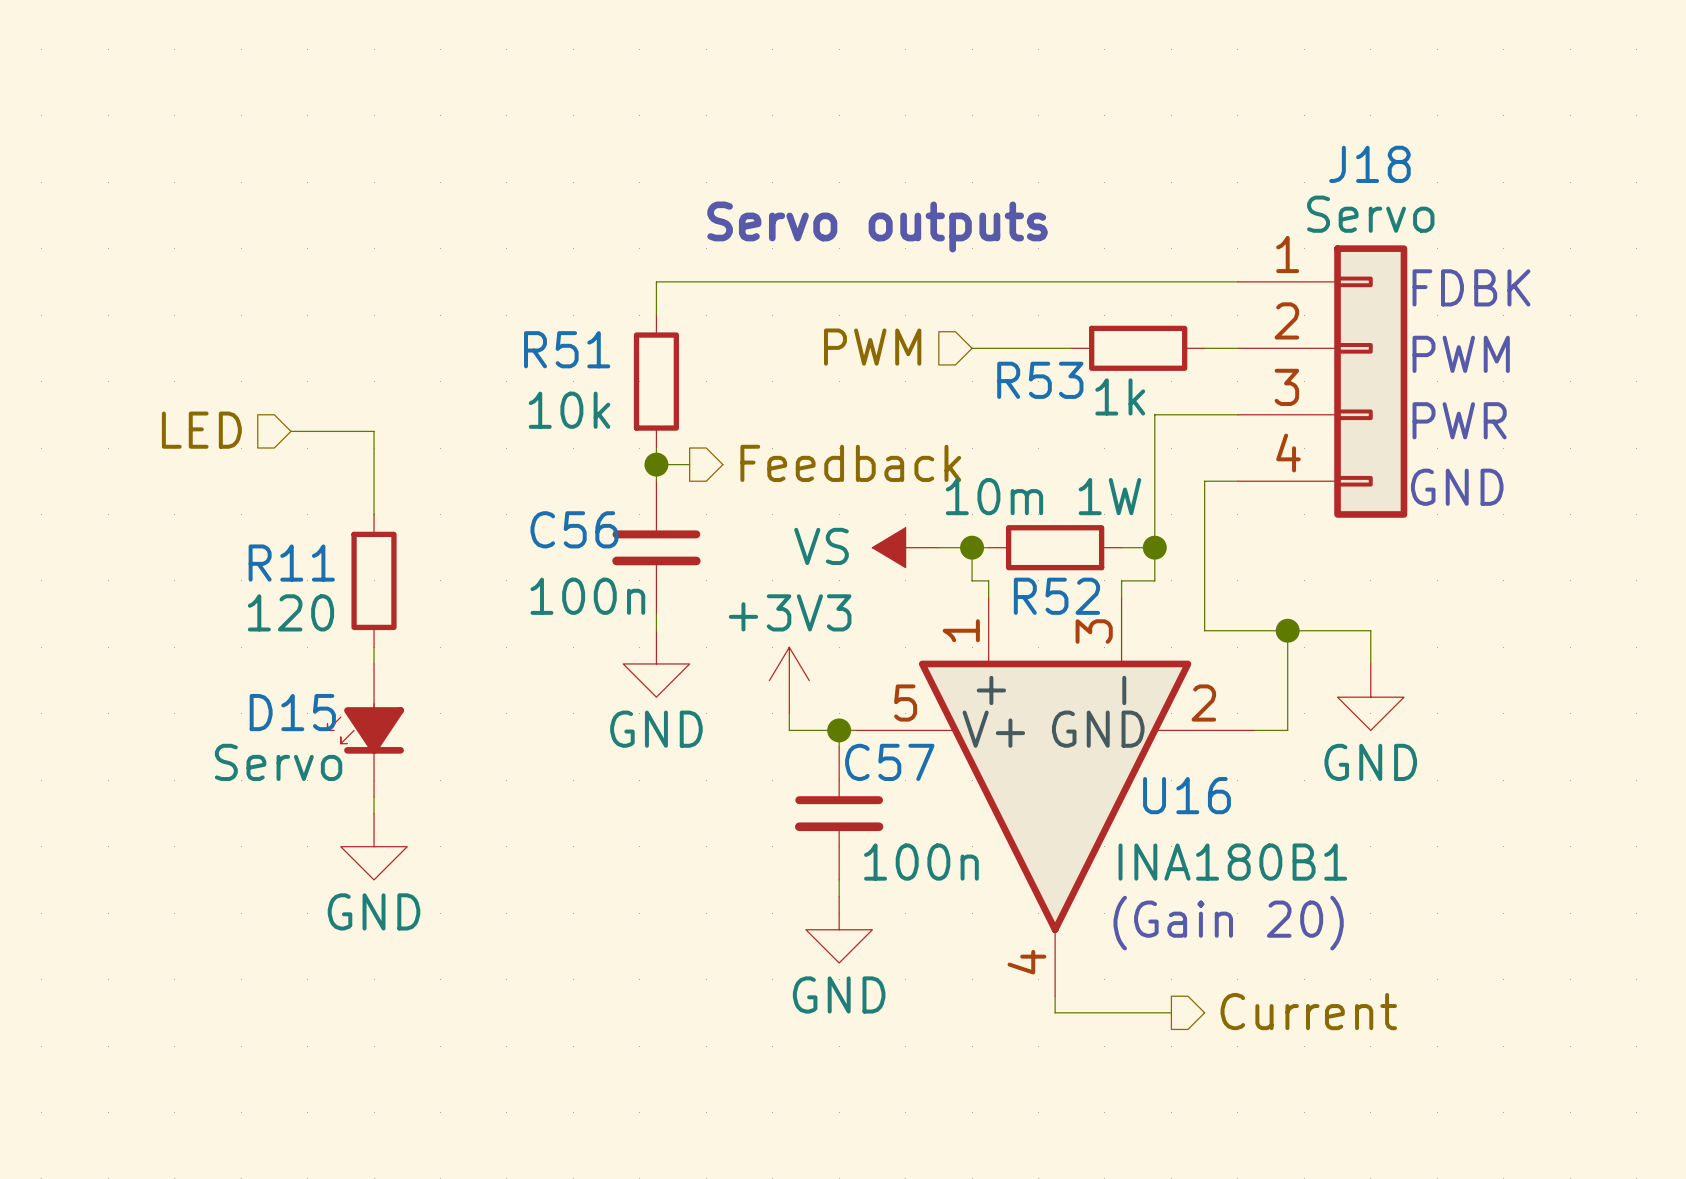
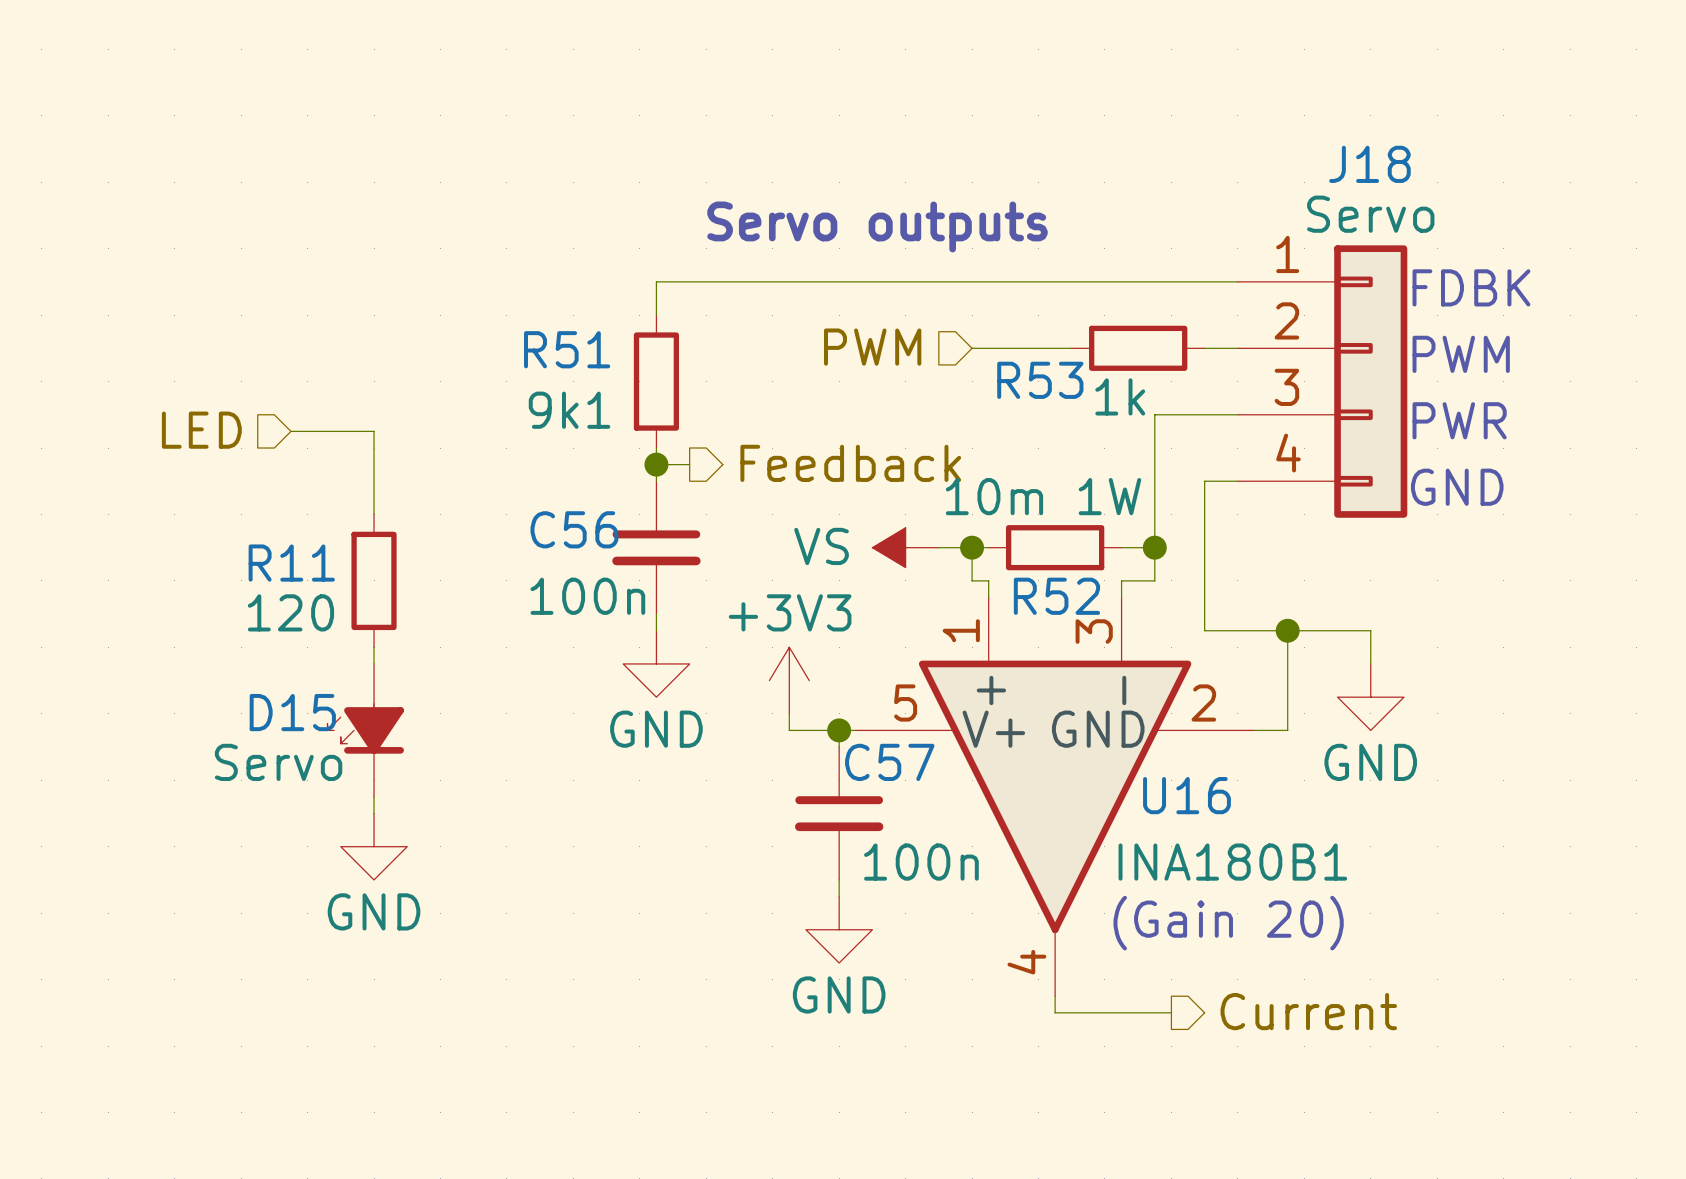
R51 value: 10k (569, 410) -> 9k1 (569, 410)

